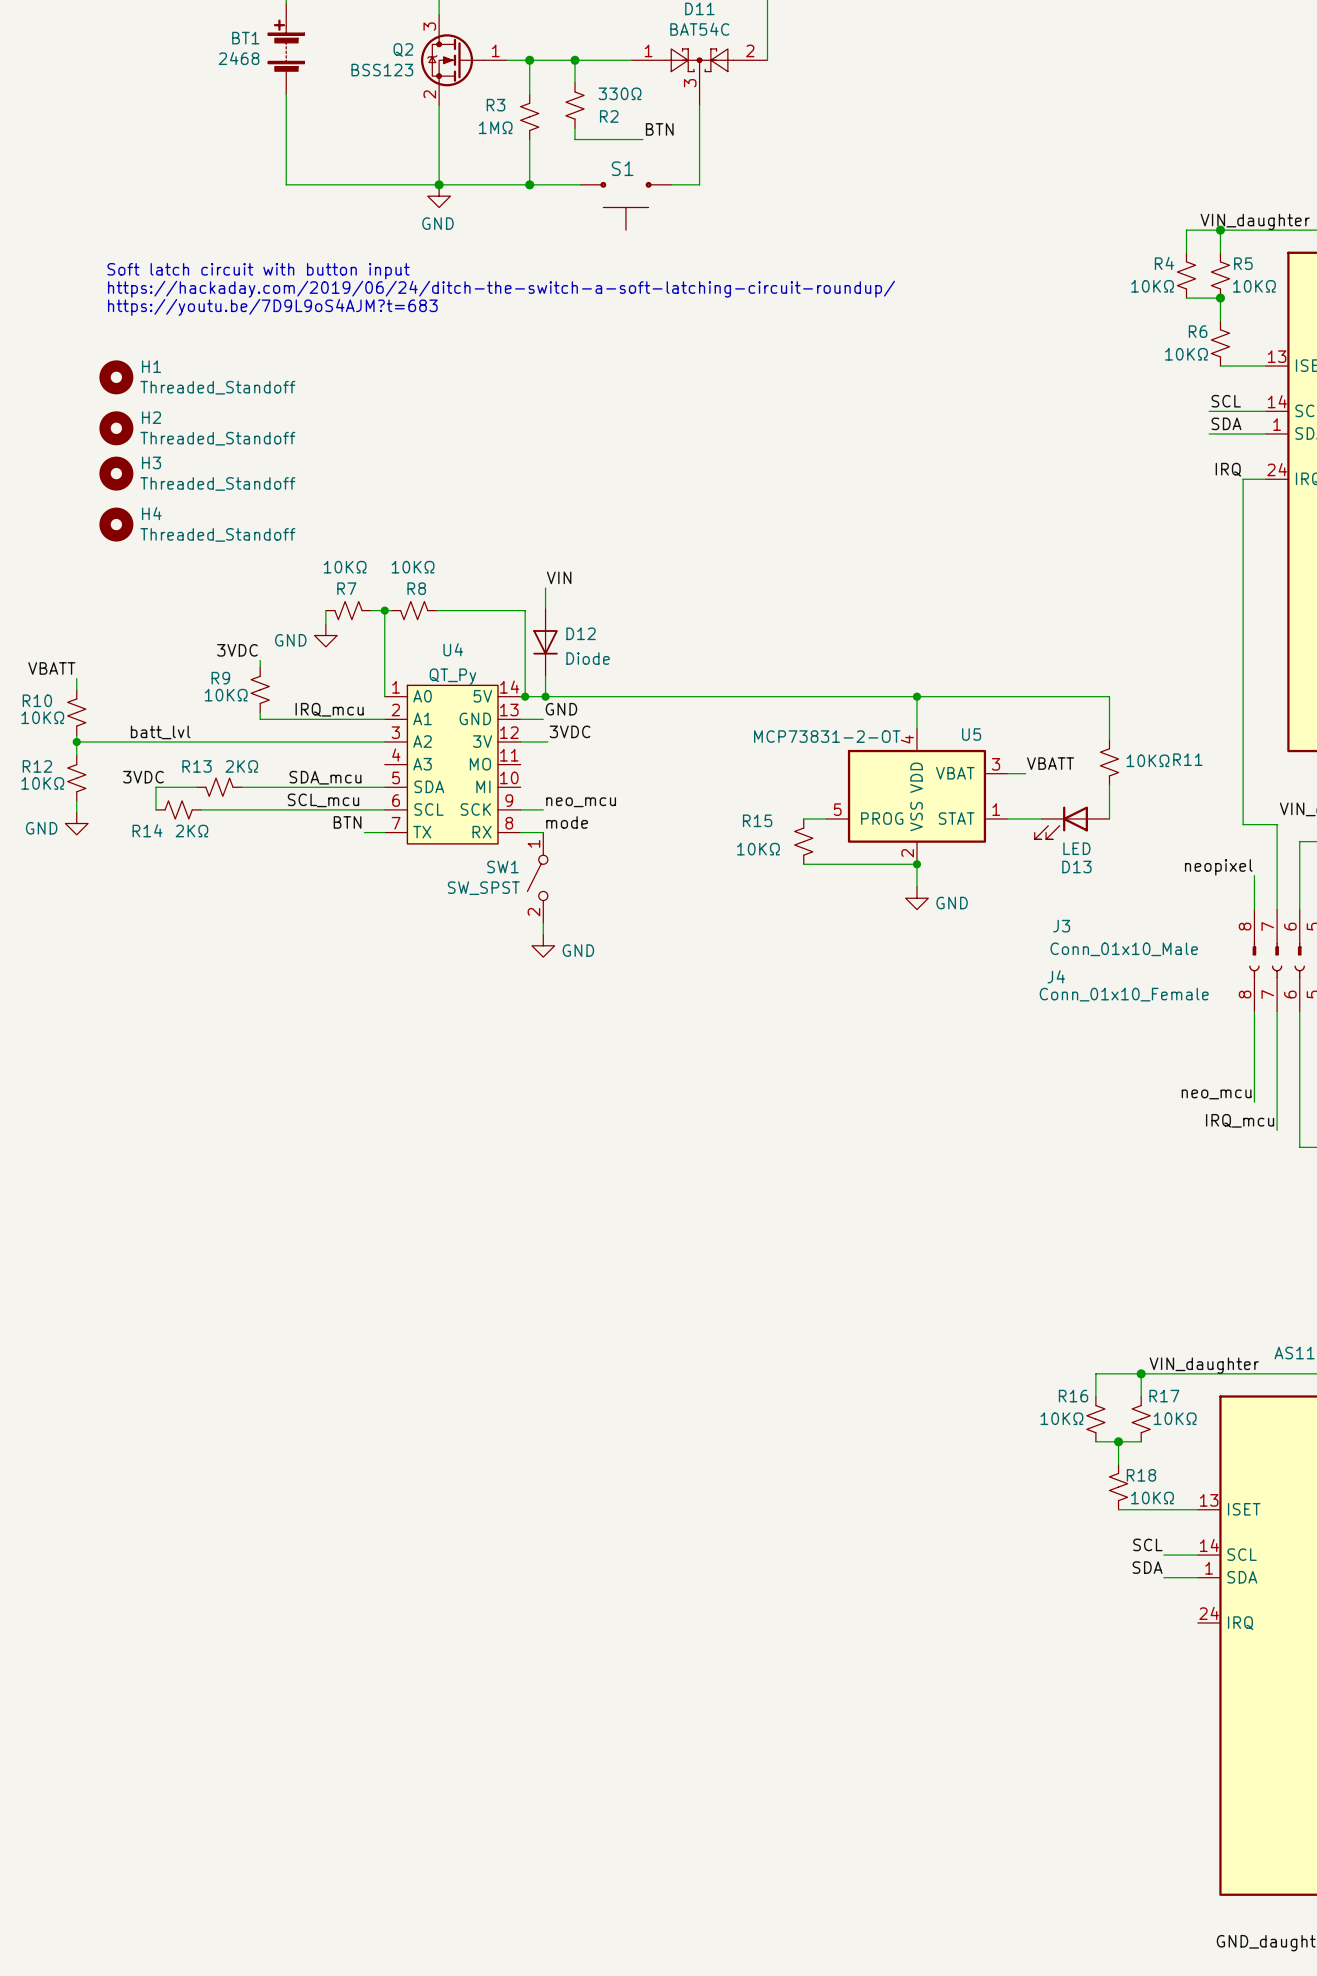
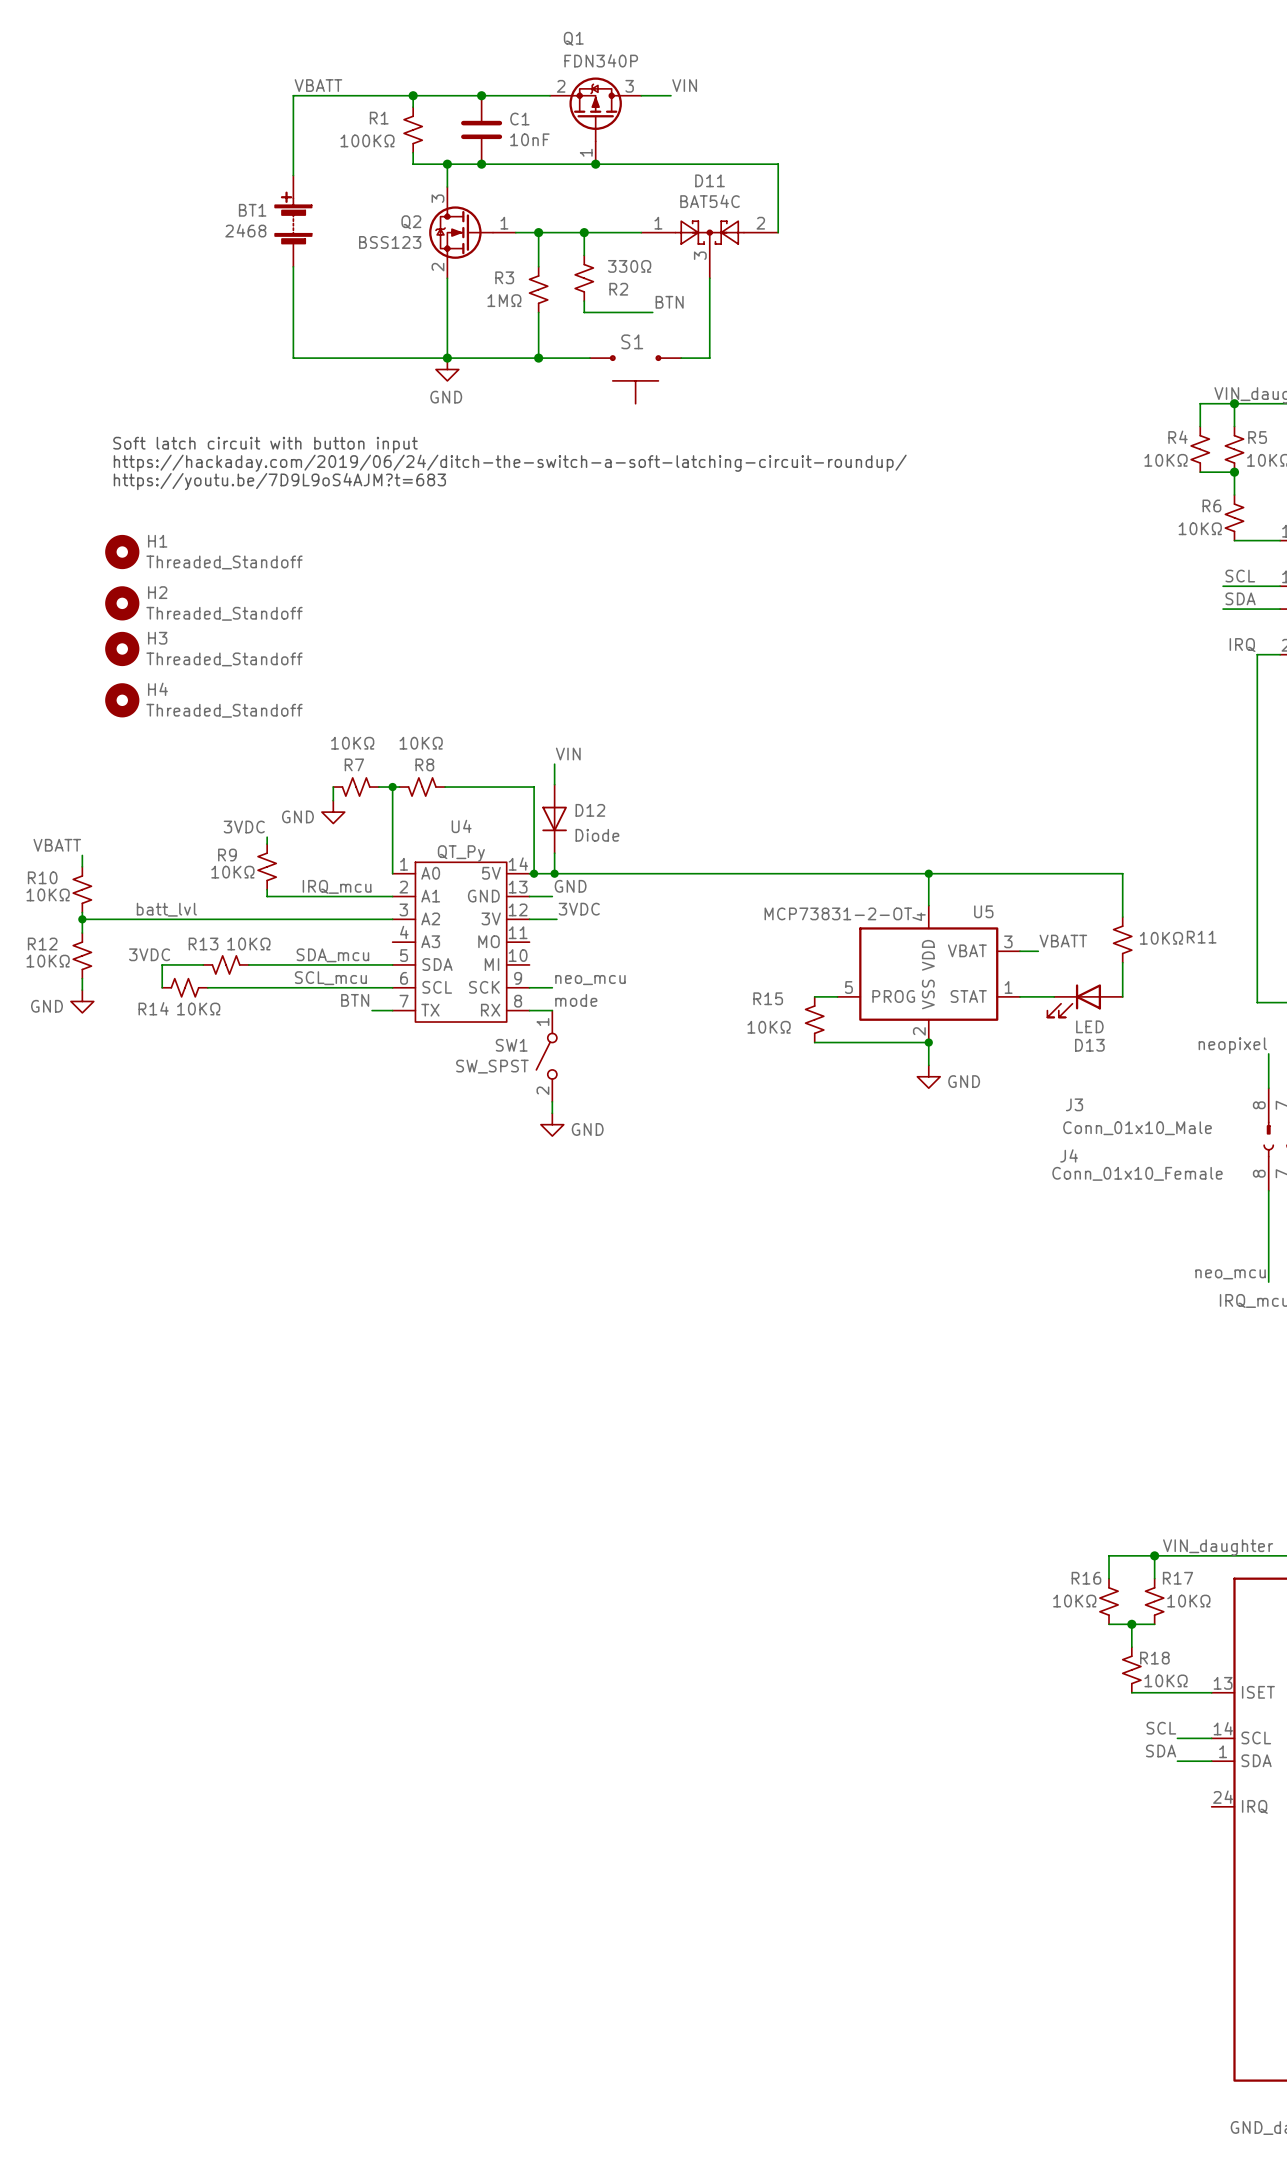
R13 value: 2KΩ (241, 766) -> 10KΩ (248, 944)
R14 value: 2KΩ (191, 831) -> 10KΩ (198, 1009)

